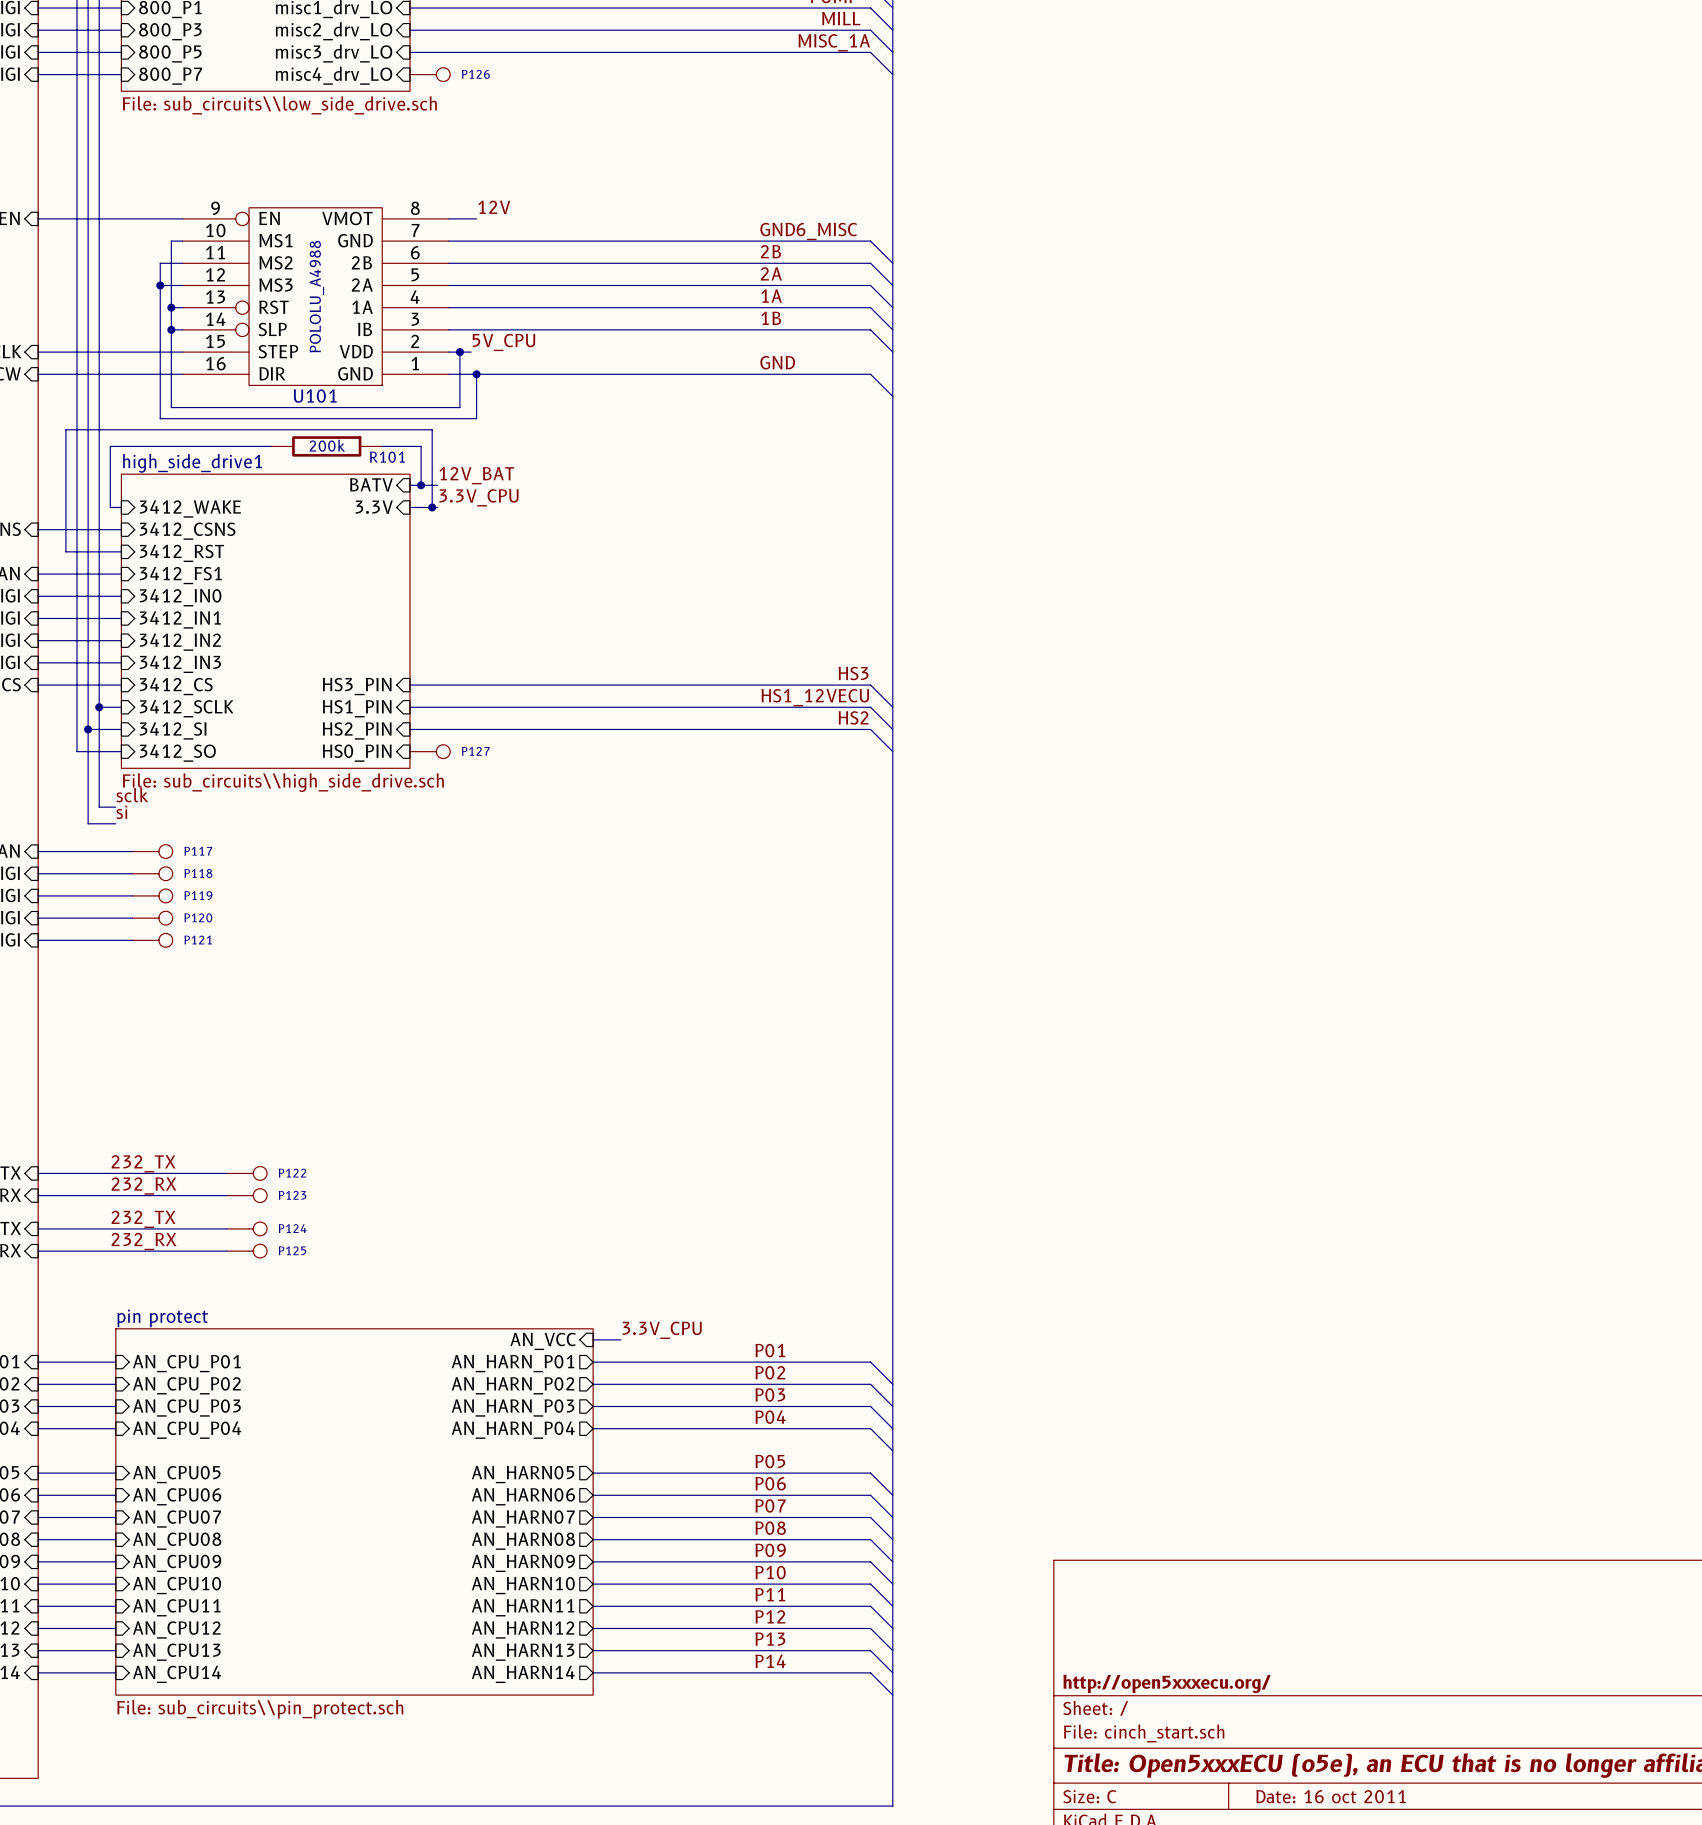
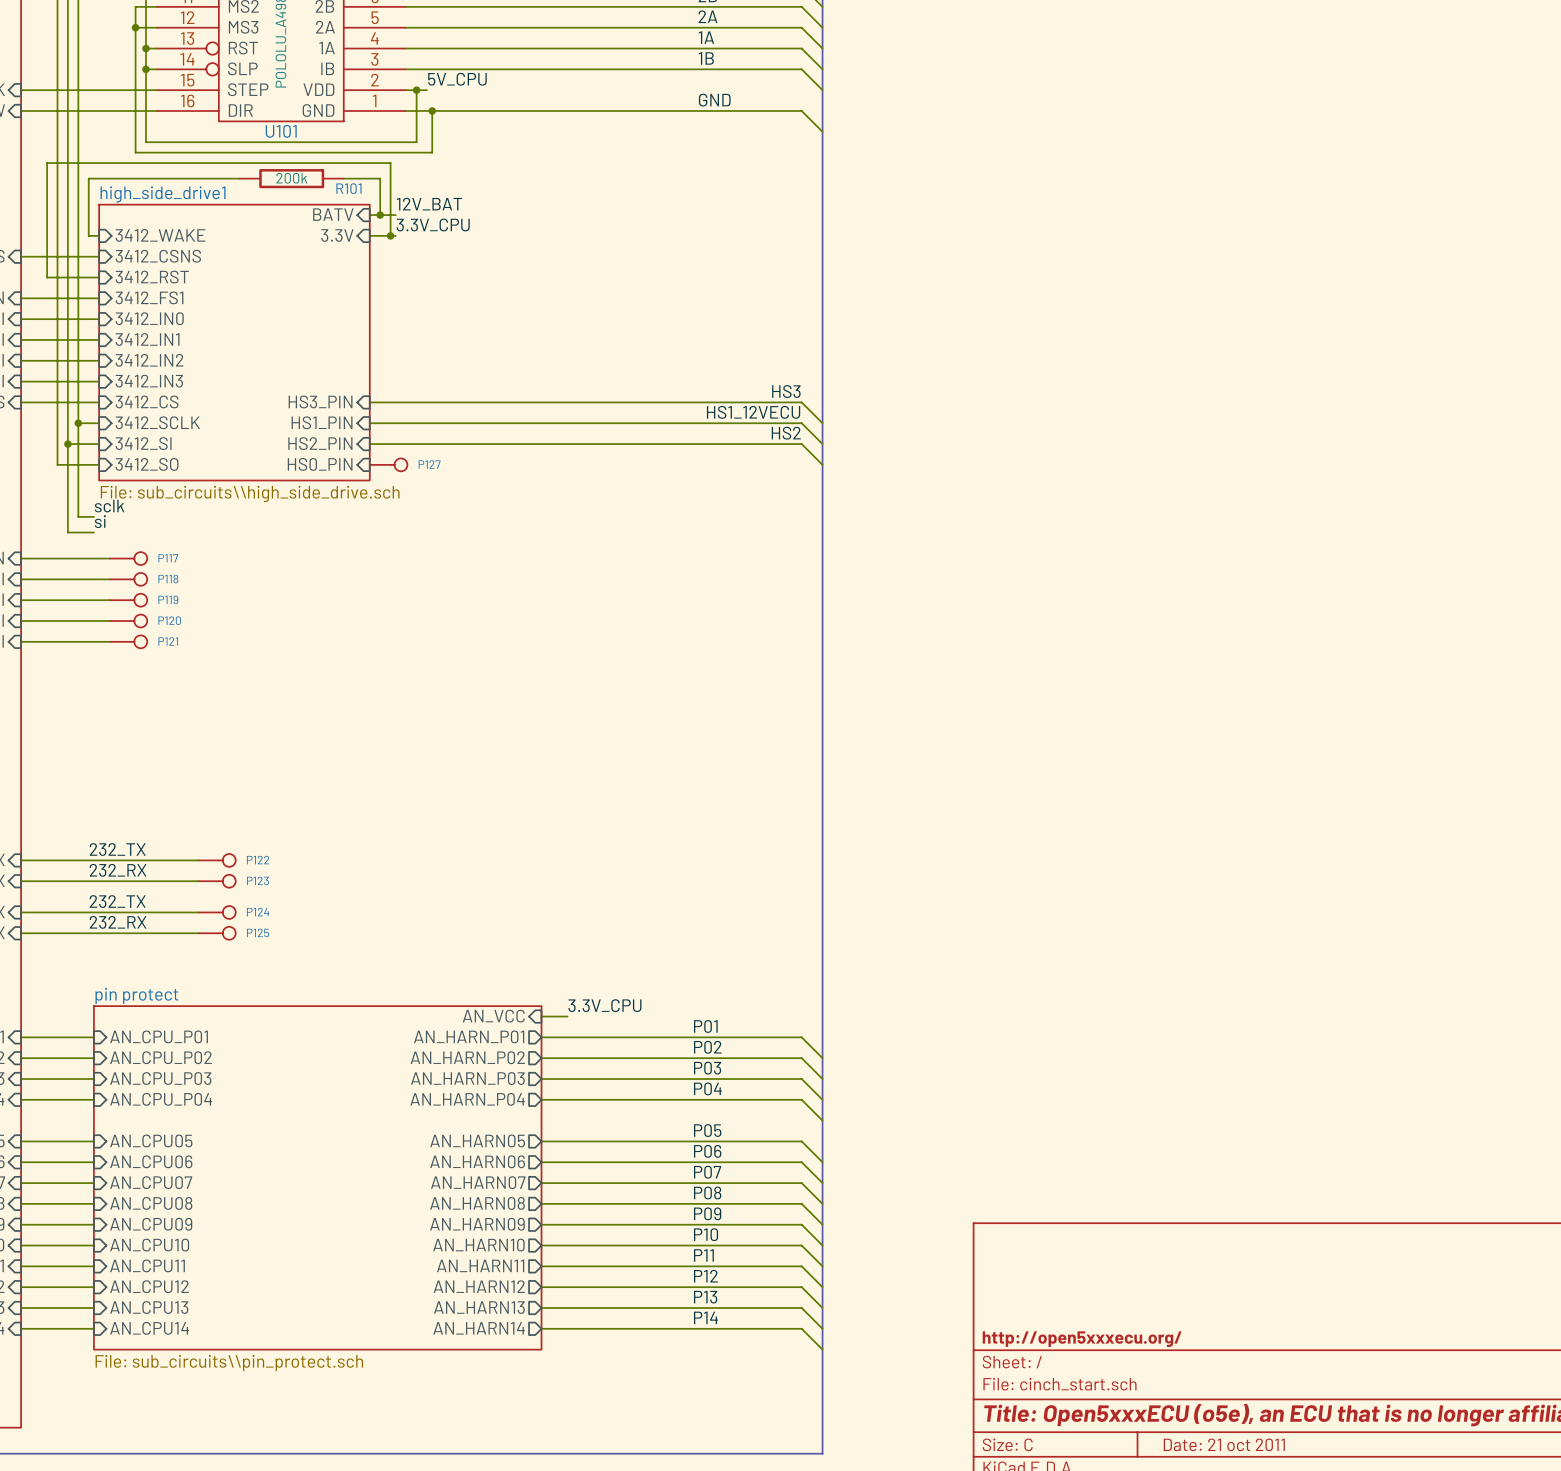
title block: Date: 16 oct 2011 (1331, 1796) -> Date: 21 oct 2011 (1224, 1444)

